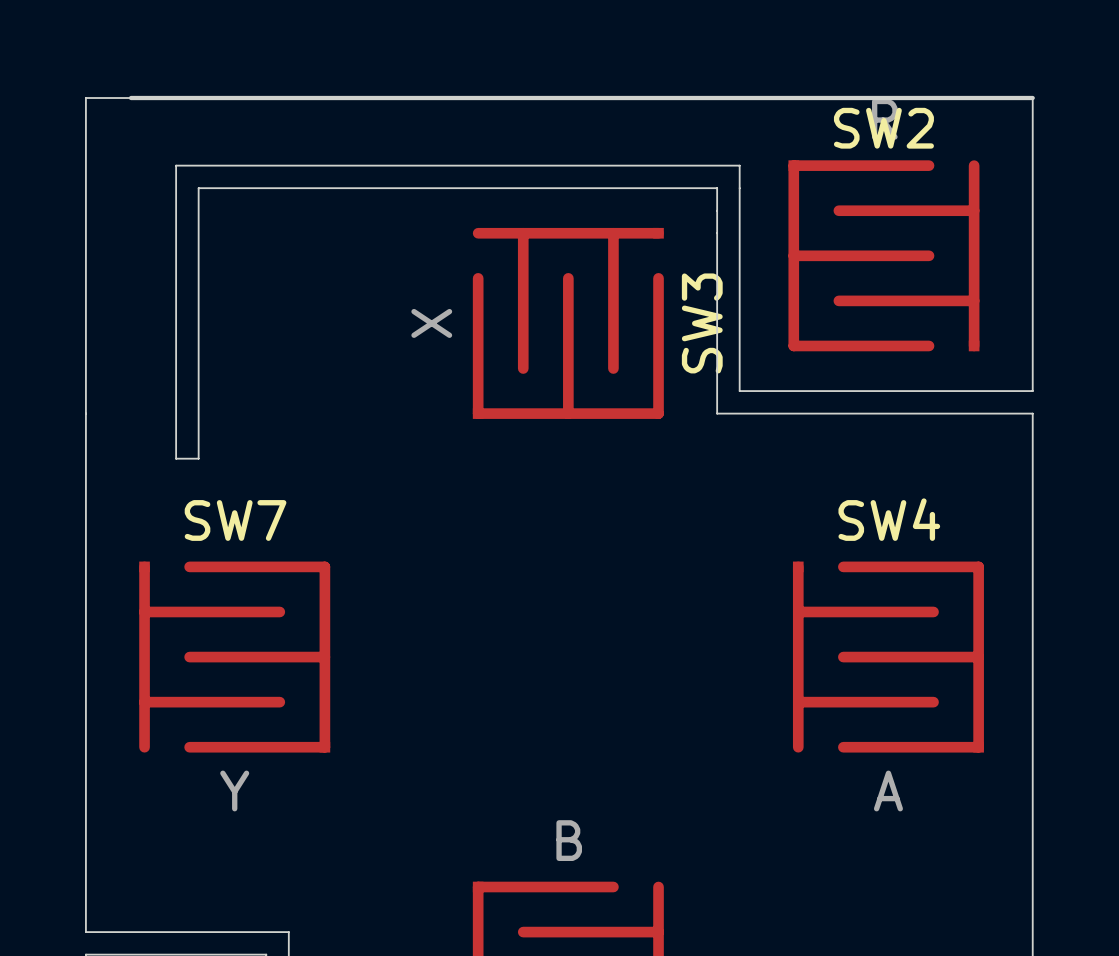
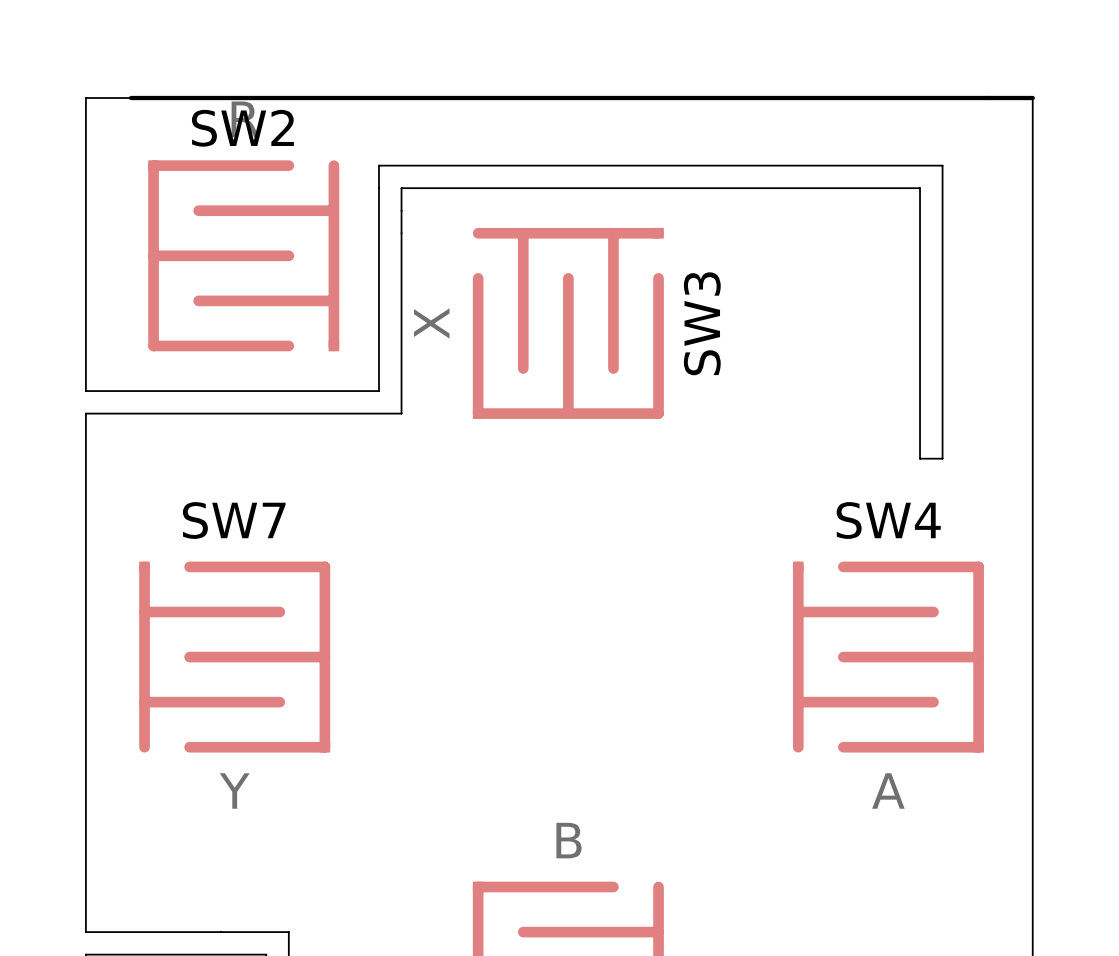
board edge: (378, 165) (176, 165) (176, 458) (198, 458) (198, 188) (401, 188) -> (378, 165) (378, 391) (85, 391)
board edge: (739, 165) (739, 391) (1032, 391) -> (739, 165) (942, 165) (942, 458) (920, 458) (920, 188) (717, 188)
board edge: (717, 188) (717, 413) (1032, 413) -> (1032, 391) (1032, 413)
SW2 position: (883, 255) -> (243, 255)
board edge: (85, 391) (85, 413) -> (401, 188) (401, 413) (85, 413)

